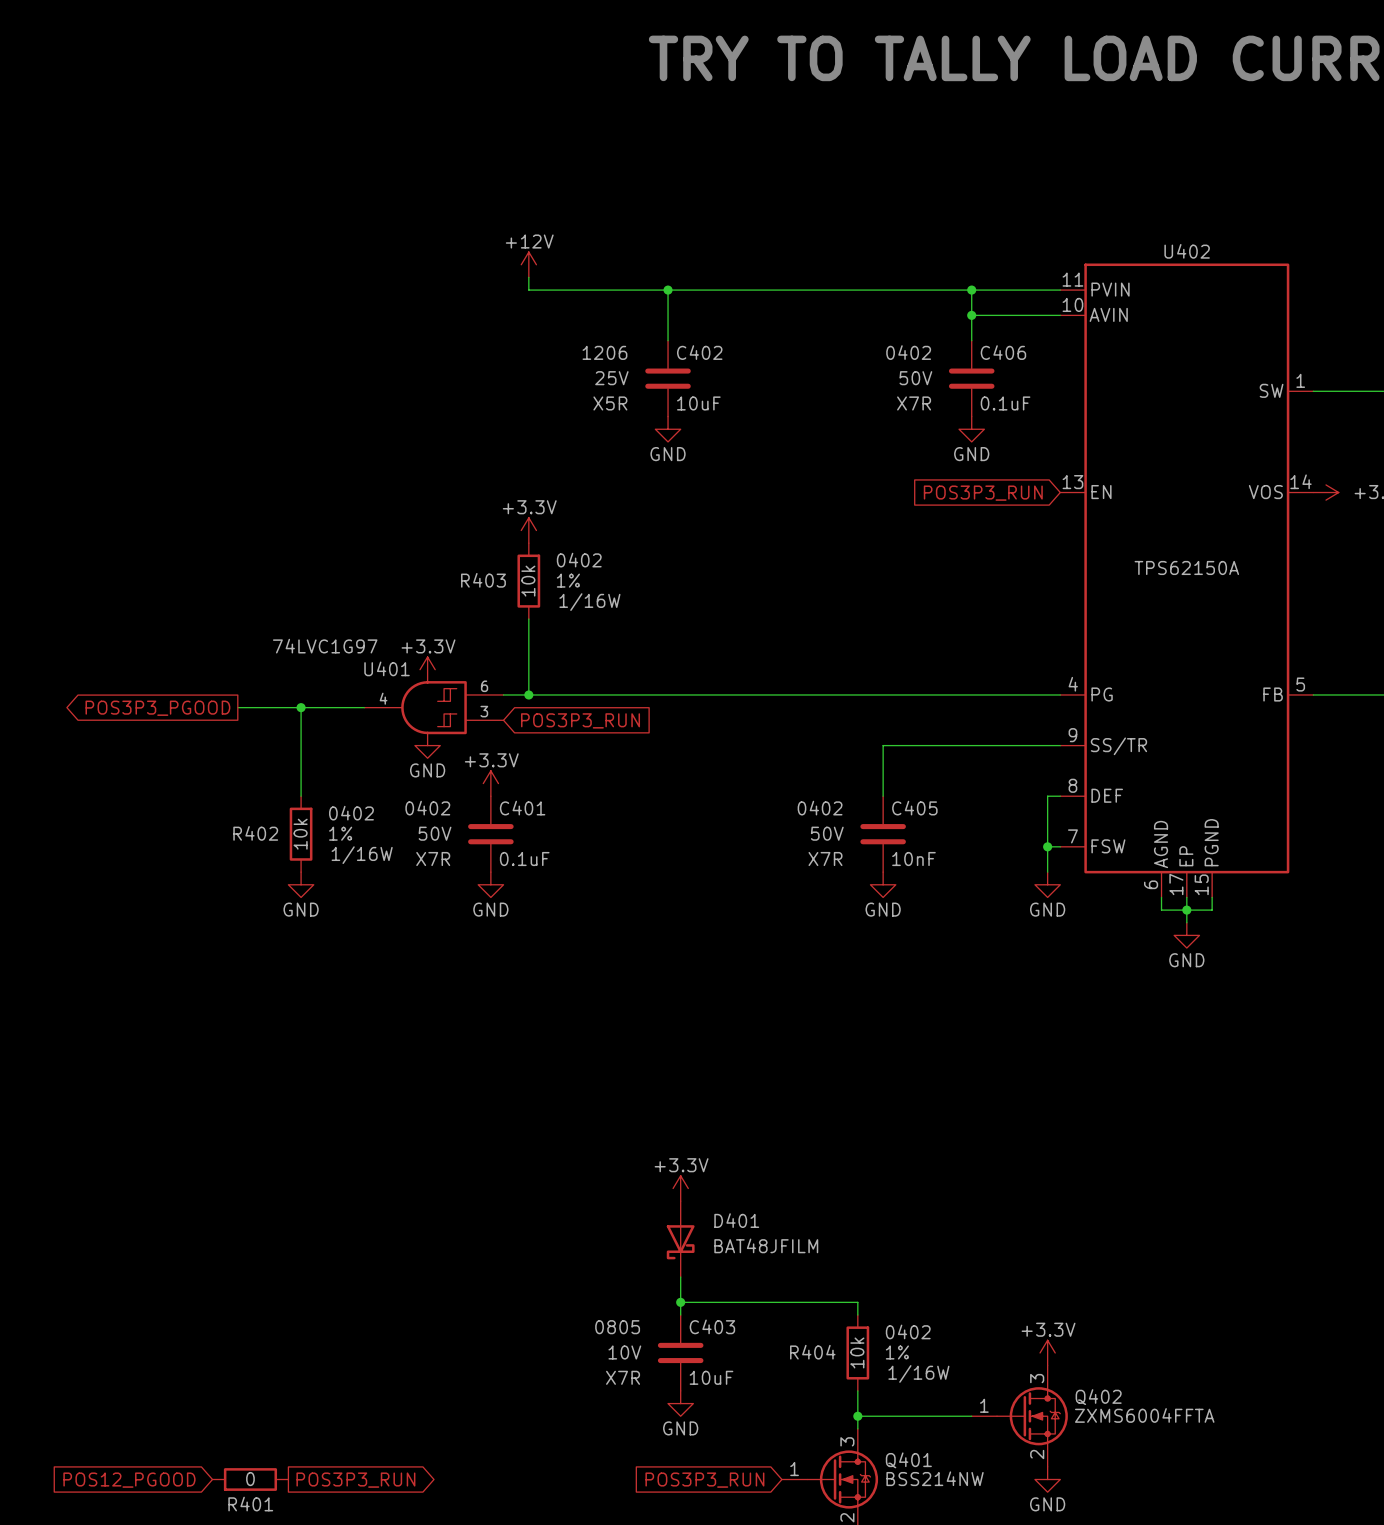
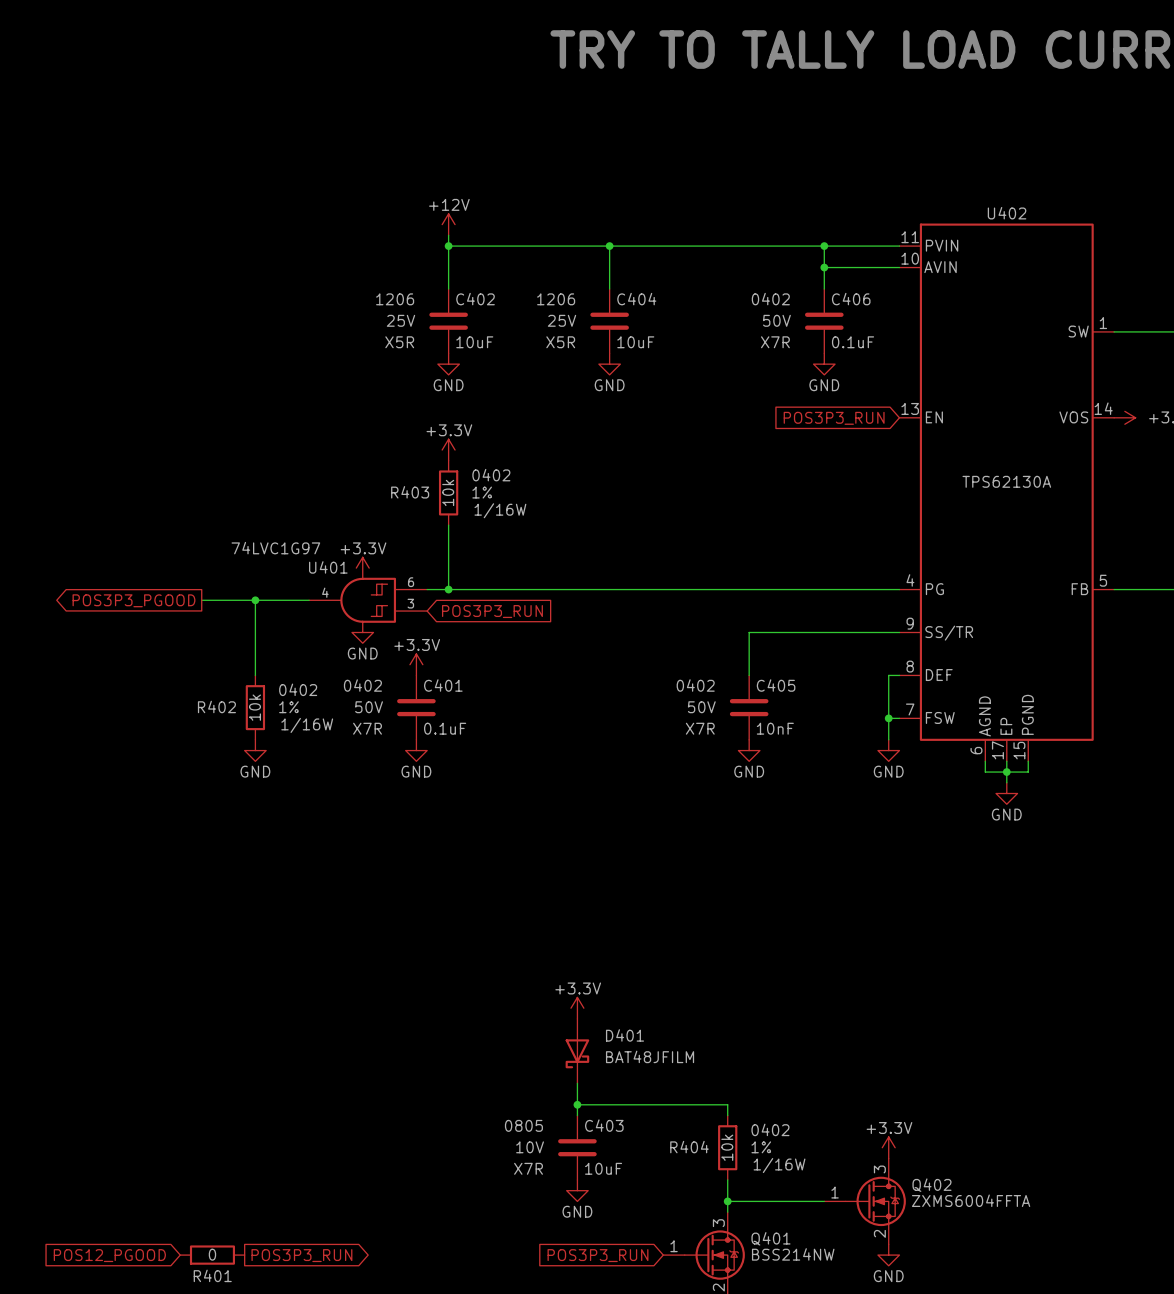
wire: none -> (448, 246) (448, 289)
junction: none -> (448, 246)
wire: (668, 290) (668, 340) -> (609, 246) (609, 289)
junction position: (668, 290) -> (609, 246)
C402 position: (668, 378) -> (448, 321)
C404: none -> 10uF (609, 321)
power symbol: none -> GND (448, 364)
power symbol position: GND (668, 429) -> GND (609, 364)
U402 value: TPS62150A (1186, 567) -> TPS62130A (1006, 481)

